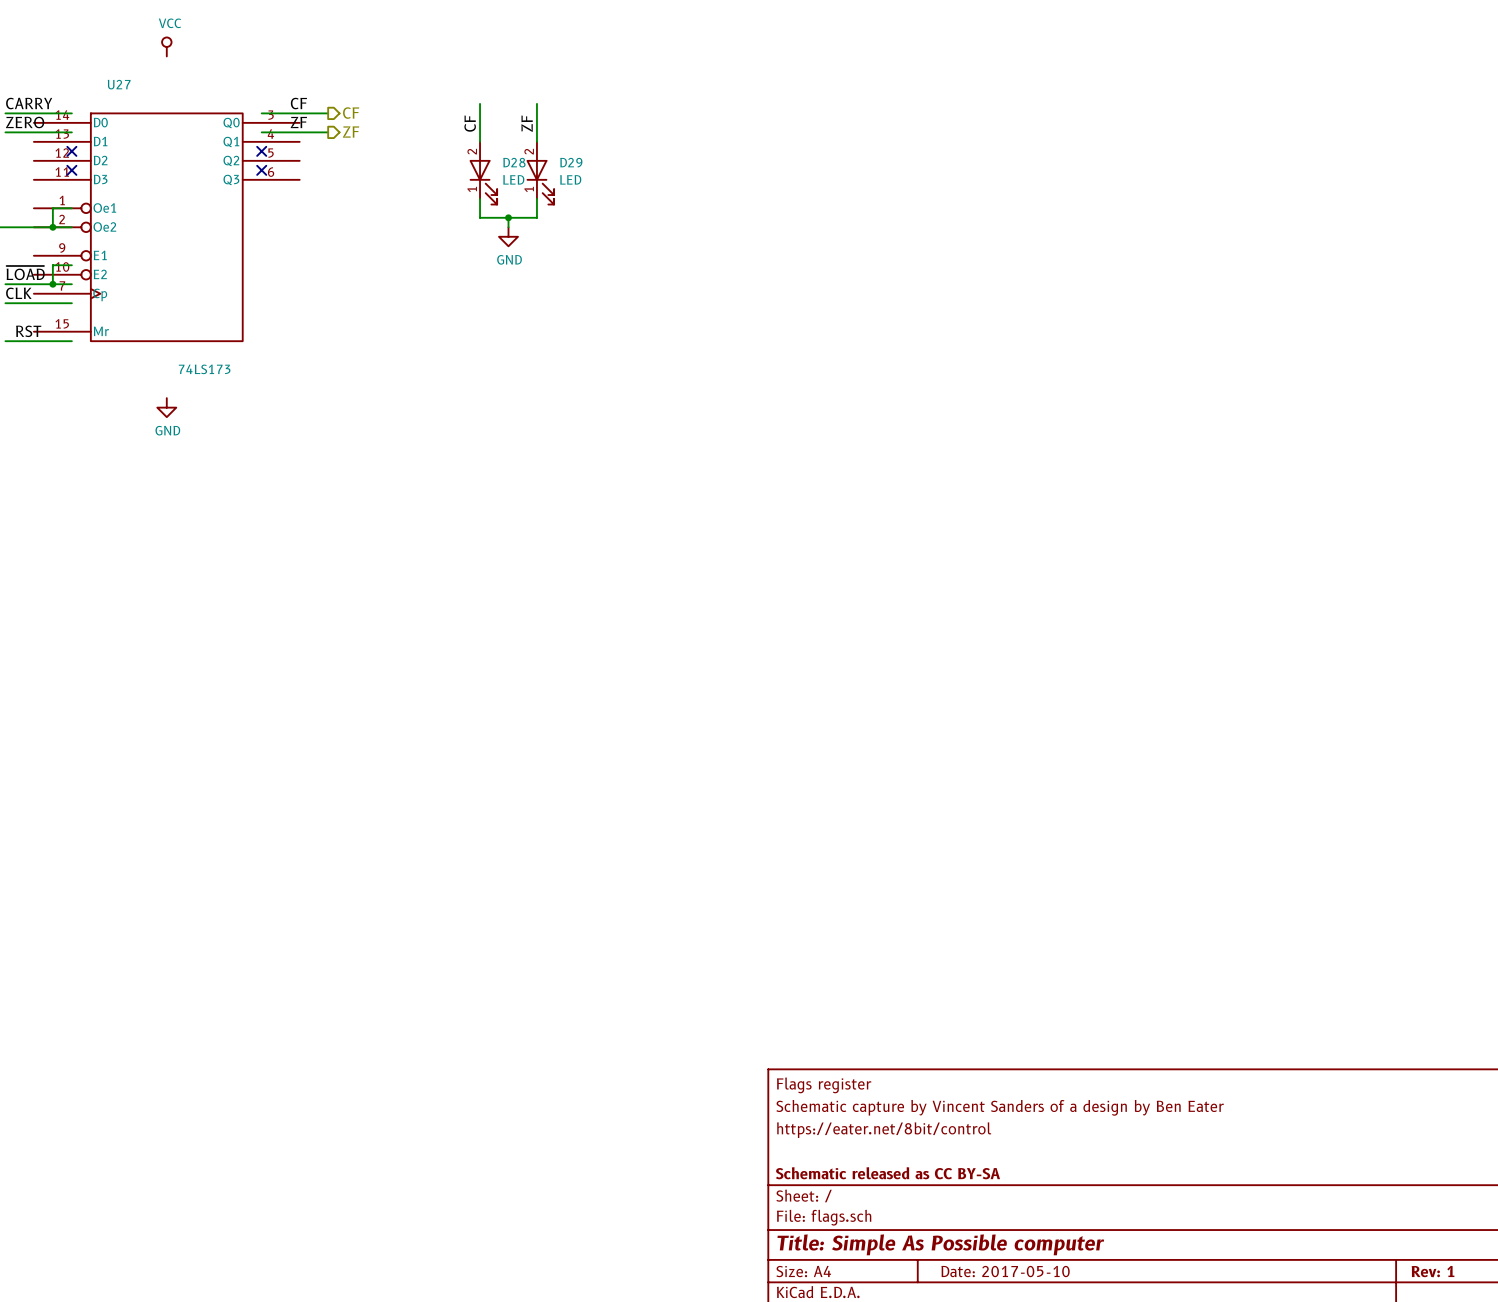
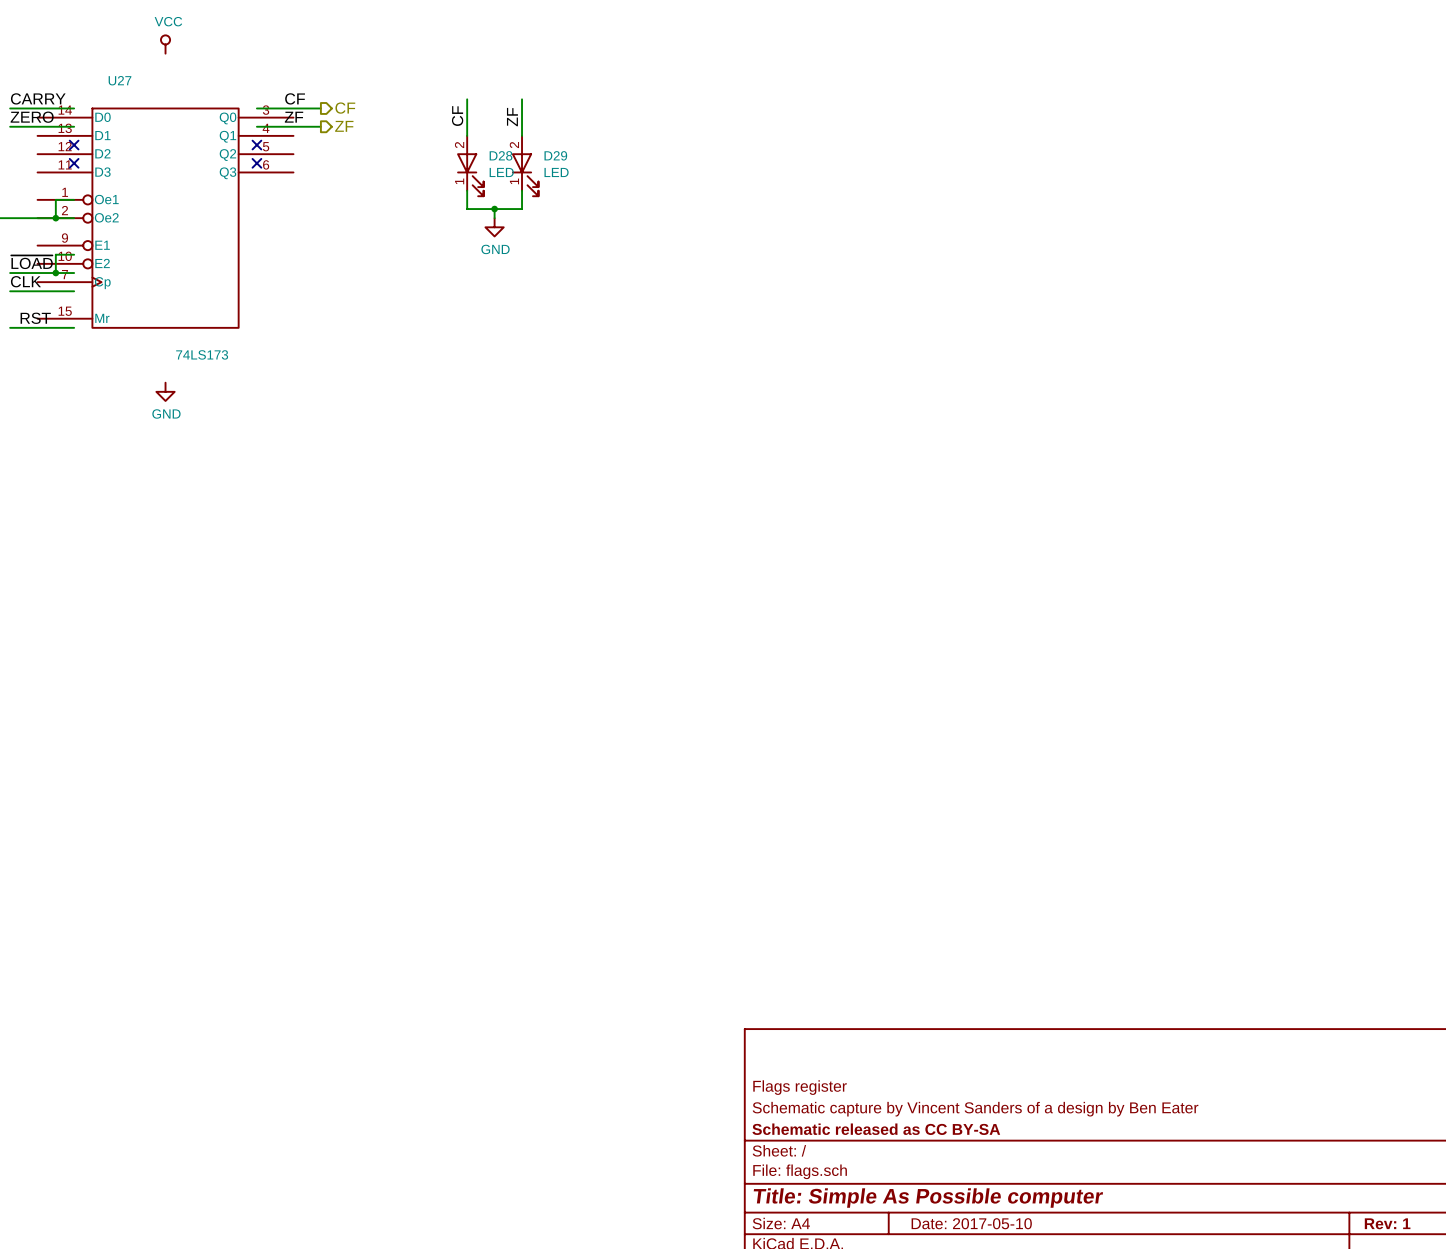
title block: Flags register (824, 1085) -> none
title block position: Schematic capture by Vincent Sanders of a design by Ben Eater (1000, 1107) -> Schematic capture by Vincent Sanders of a design by Ben Eater (975, 1109)
title block: https://eater.net/8bit/control (884, 1130) -> Flags register (800, 1087)

